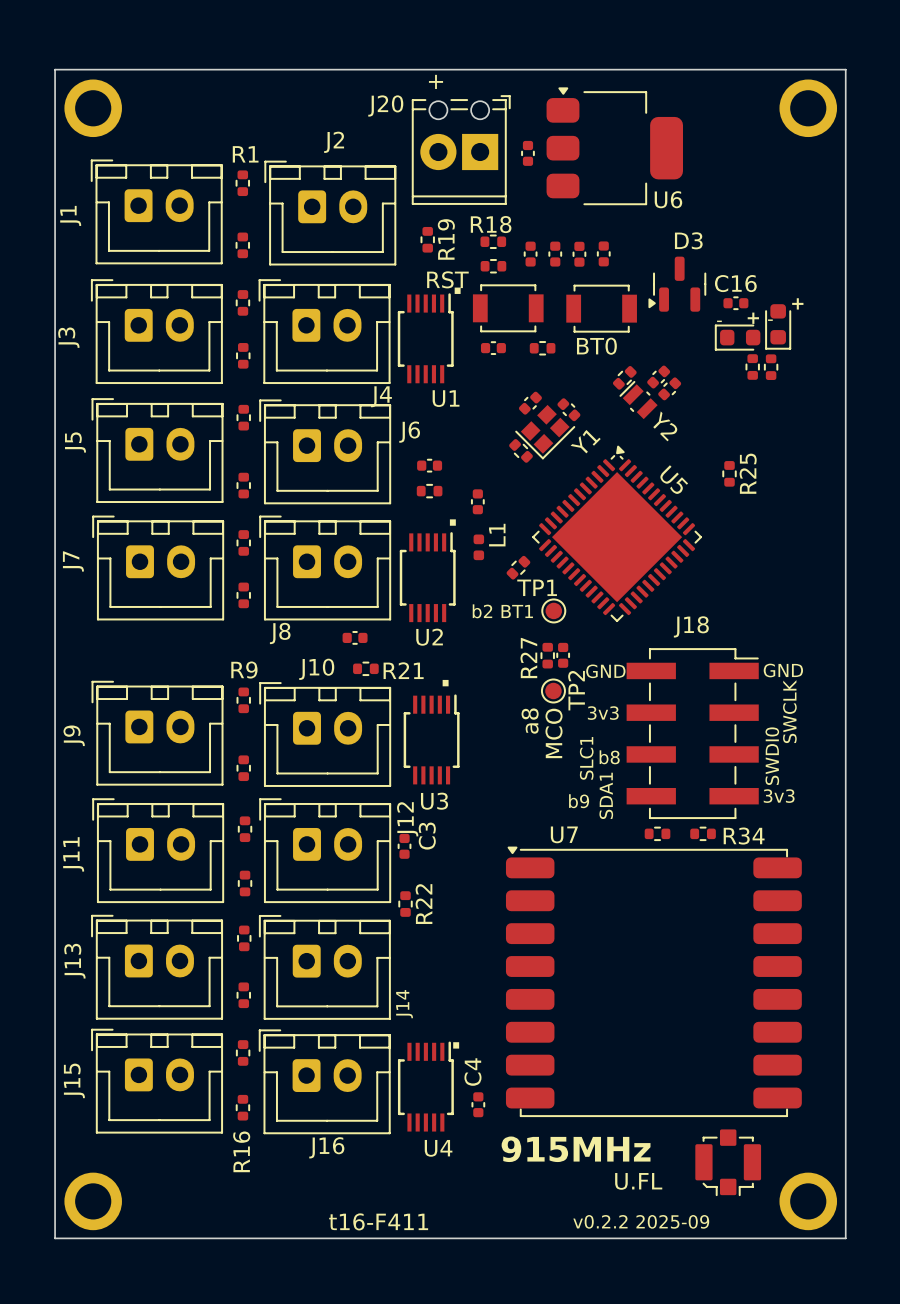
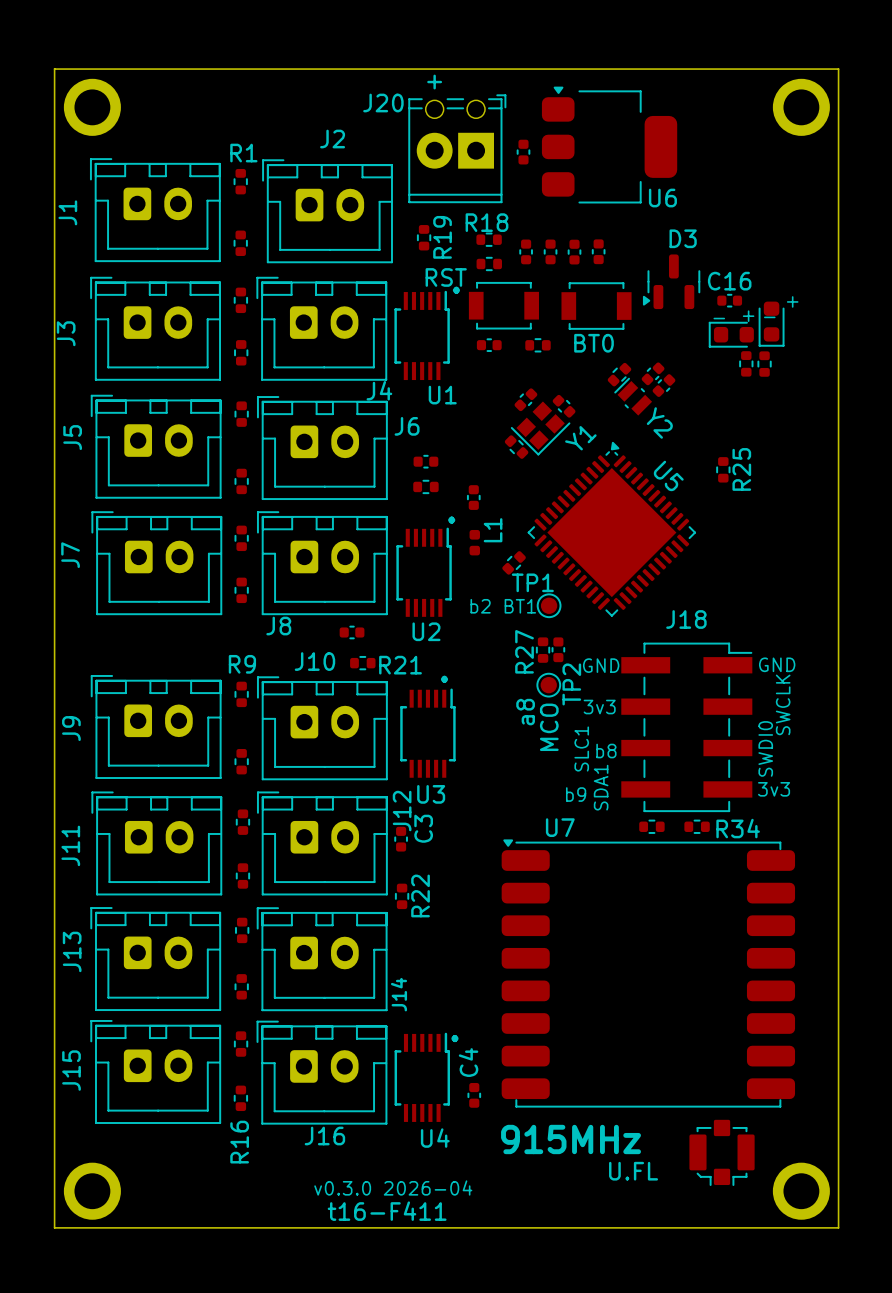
text: none -> v0.3.0 2026-04 (393, 1188)
text: v0.2.2 2025-09 (641, 1221) -> none

